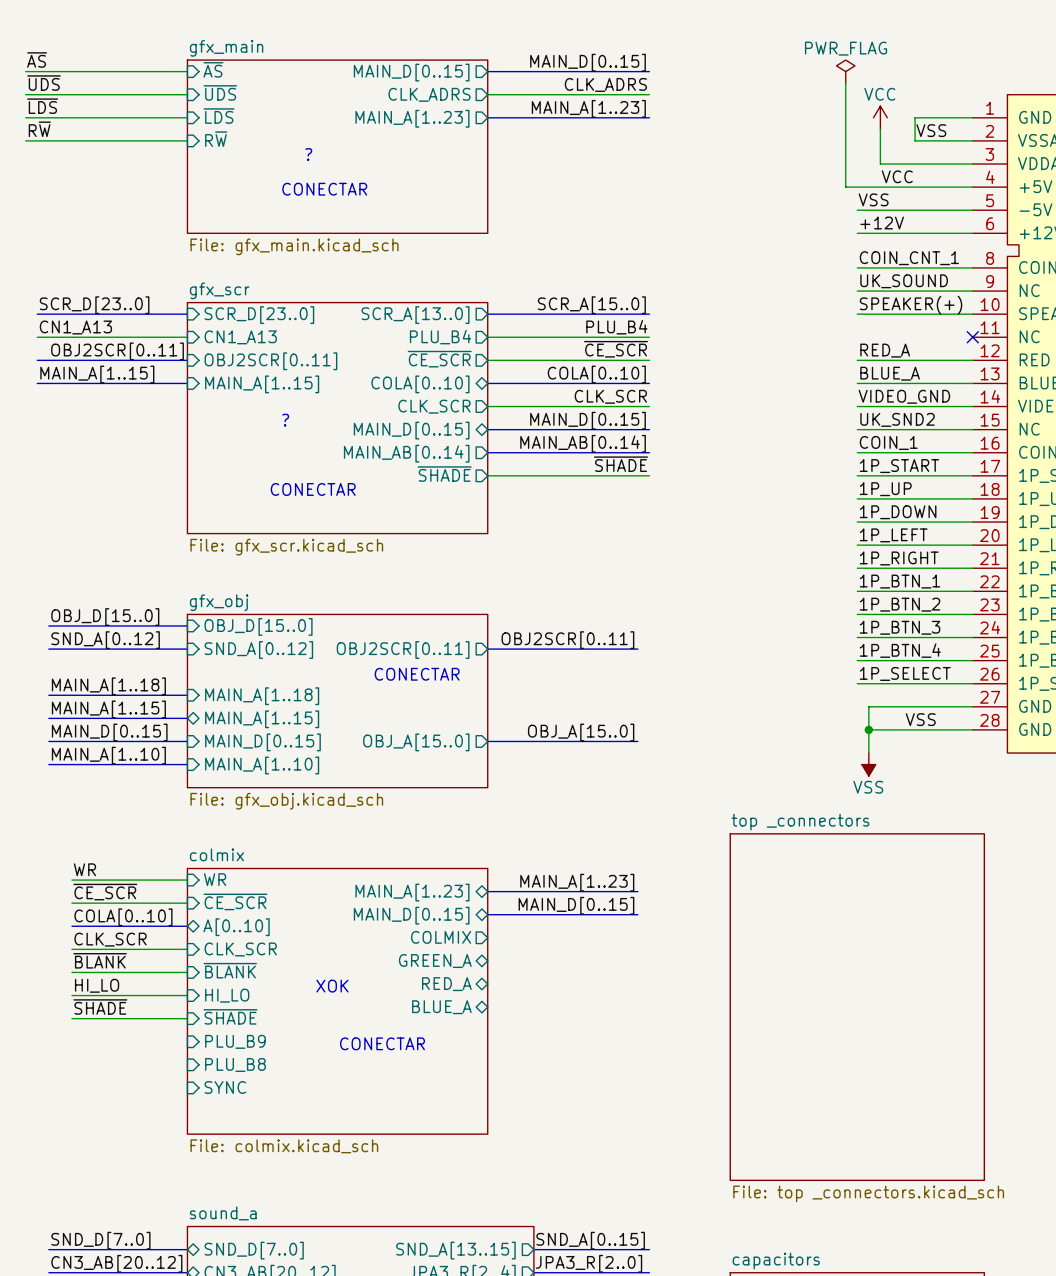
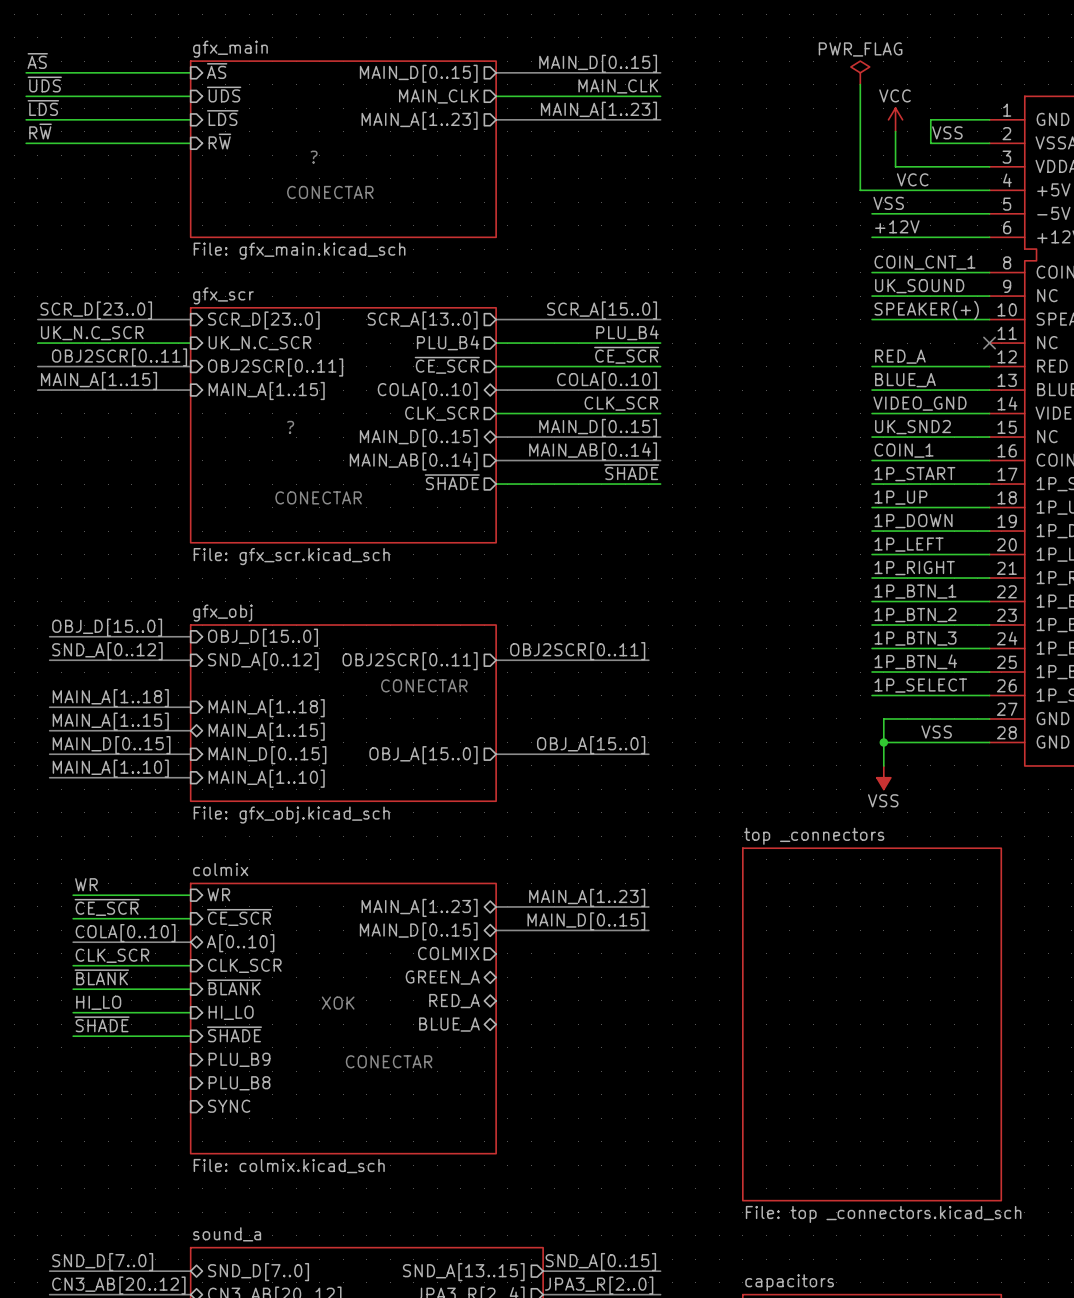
label: CLK_ADRS (605, 84) -> MAIN_CLK (618, 86)
sheet pin: CLK_ADRS (429, 94) -> MAIN_CLK (438, 96)
label: CN1_A13 (75, 327) -> UK_N.C_SCR (92, 333)
sheet pin: CN1_A13 (240, 337) -> UK_N.C_SCR (259, 343)

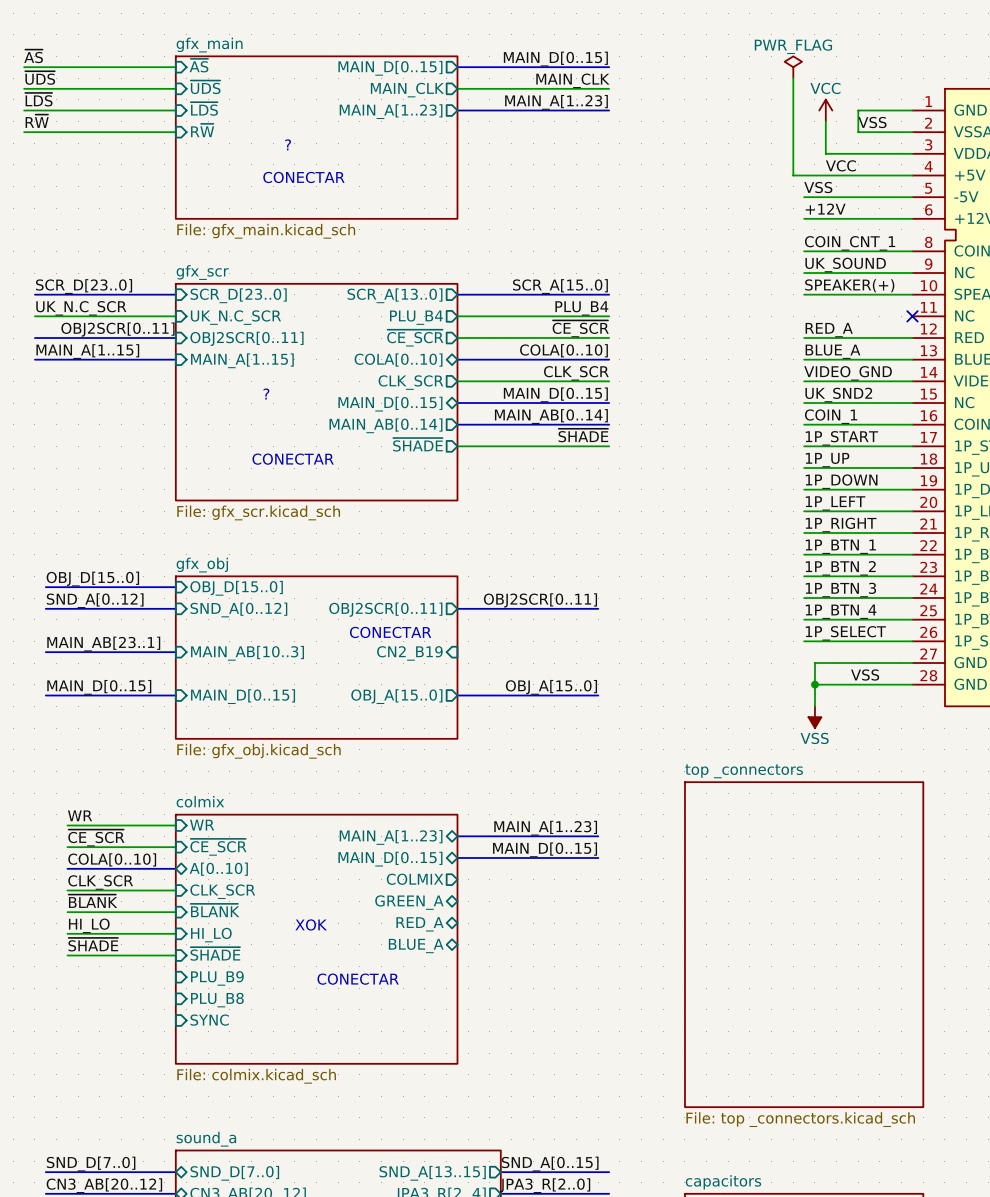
label: MAIN_A[1..18] (110, 698) -> MAIN_AB[23..1] (103, 644)
sheet pin: none -> CN2_B19 (409, 653)
sheet pin: MAIN_A[1..18] (266, 708) -> MAIN_AB[10..3] (247, 653)
label: MAIN_A[1..15] (110, 721) -> none
bus: (49, 730) (190, 730) -> none
sheet pin: MAIN_A[1..15] (266, 731) -> none
label: MAIN_A[1..10] (110, 768) -> none
bus: (49, 777) (190, 777) -> none
sheet pin: MAIN_A[1..10] (266, 778) -> none

